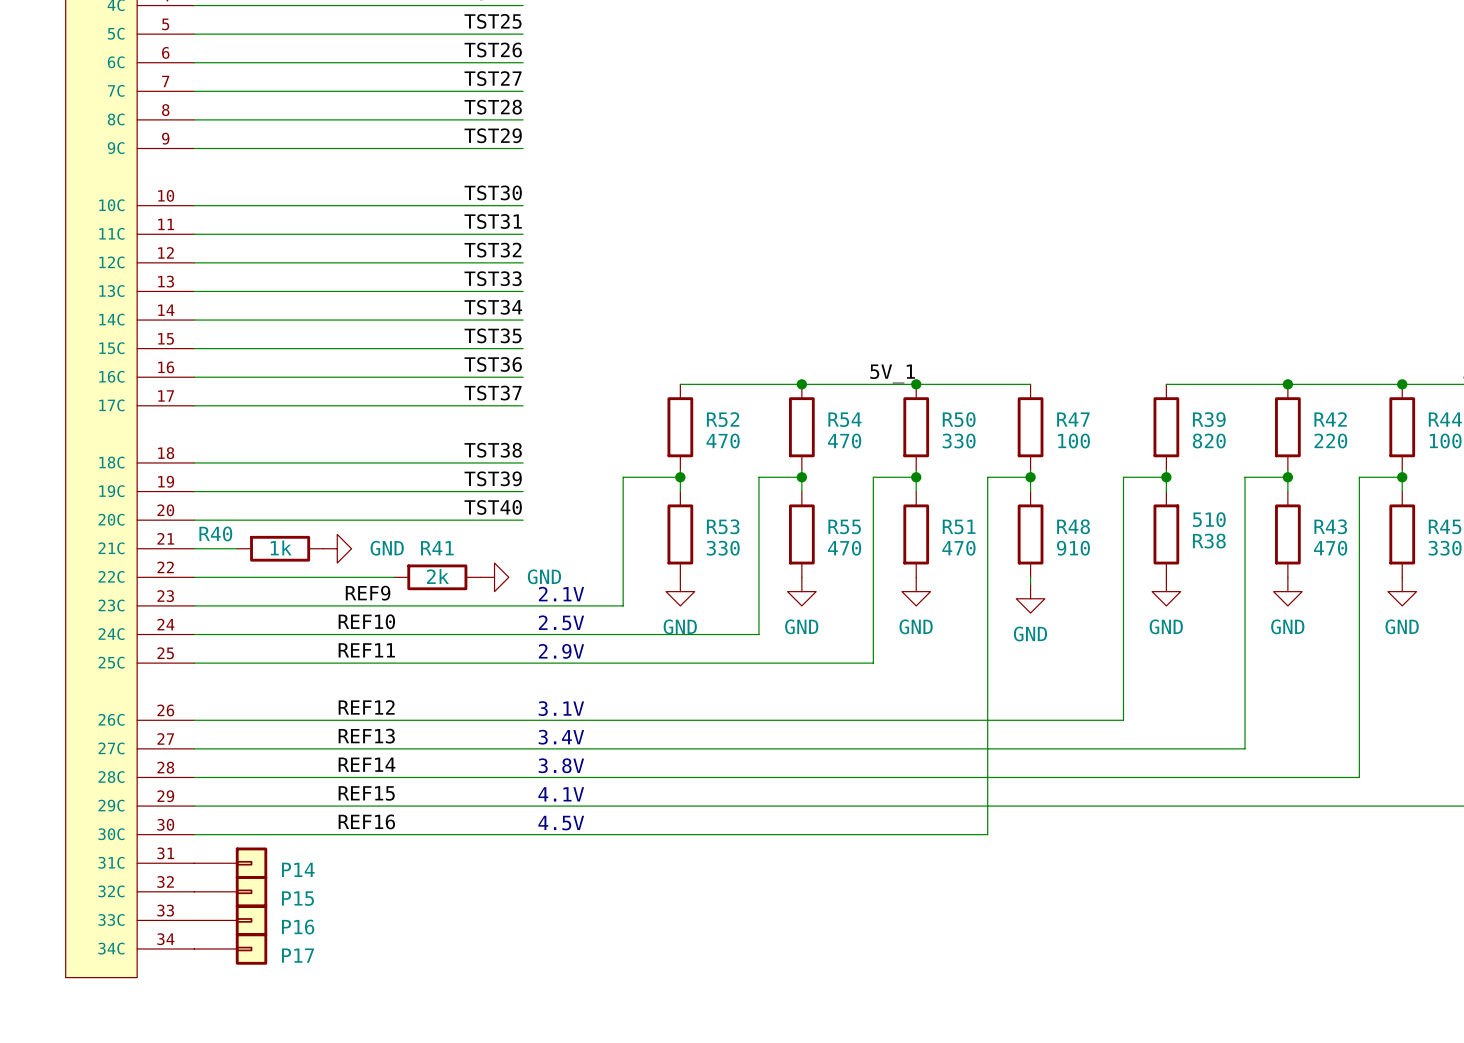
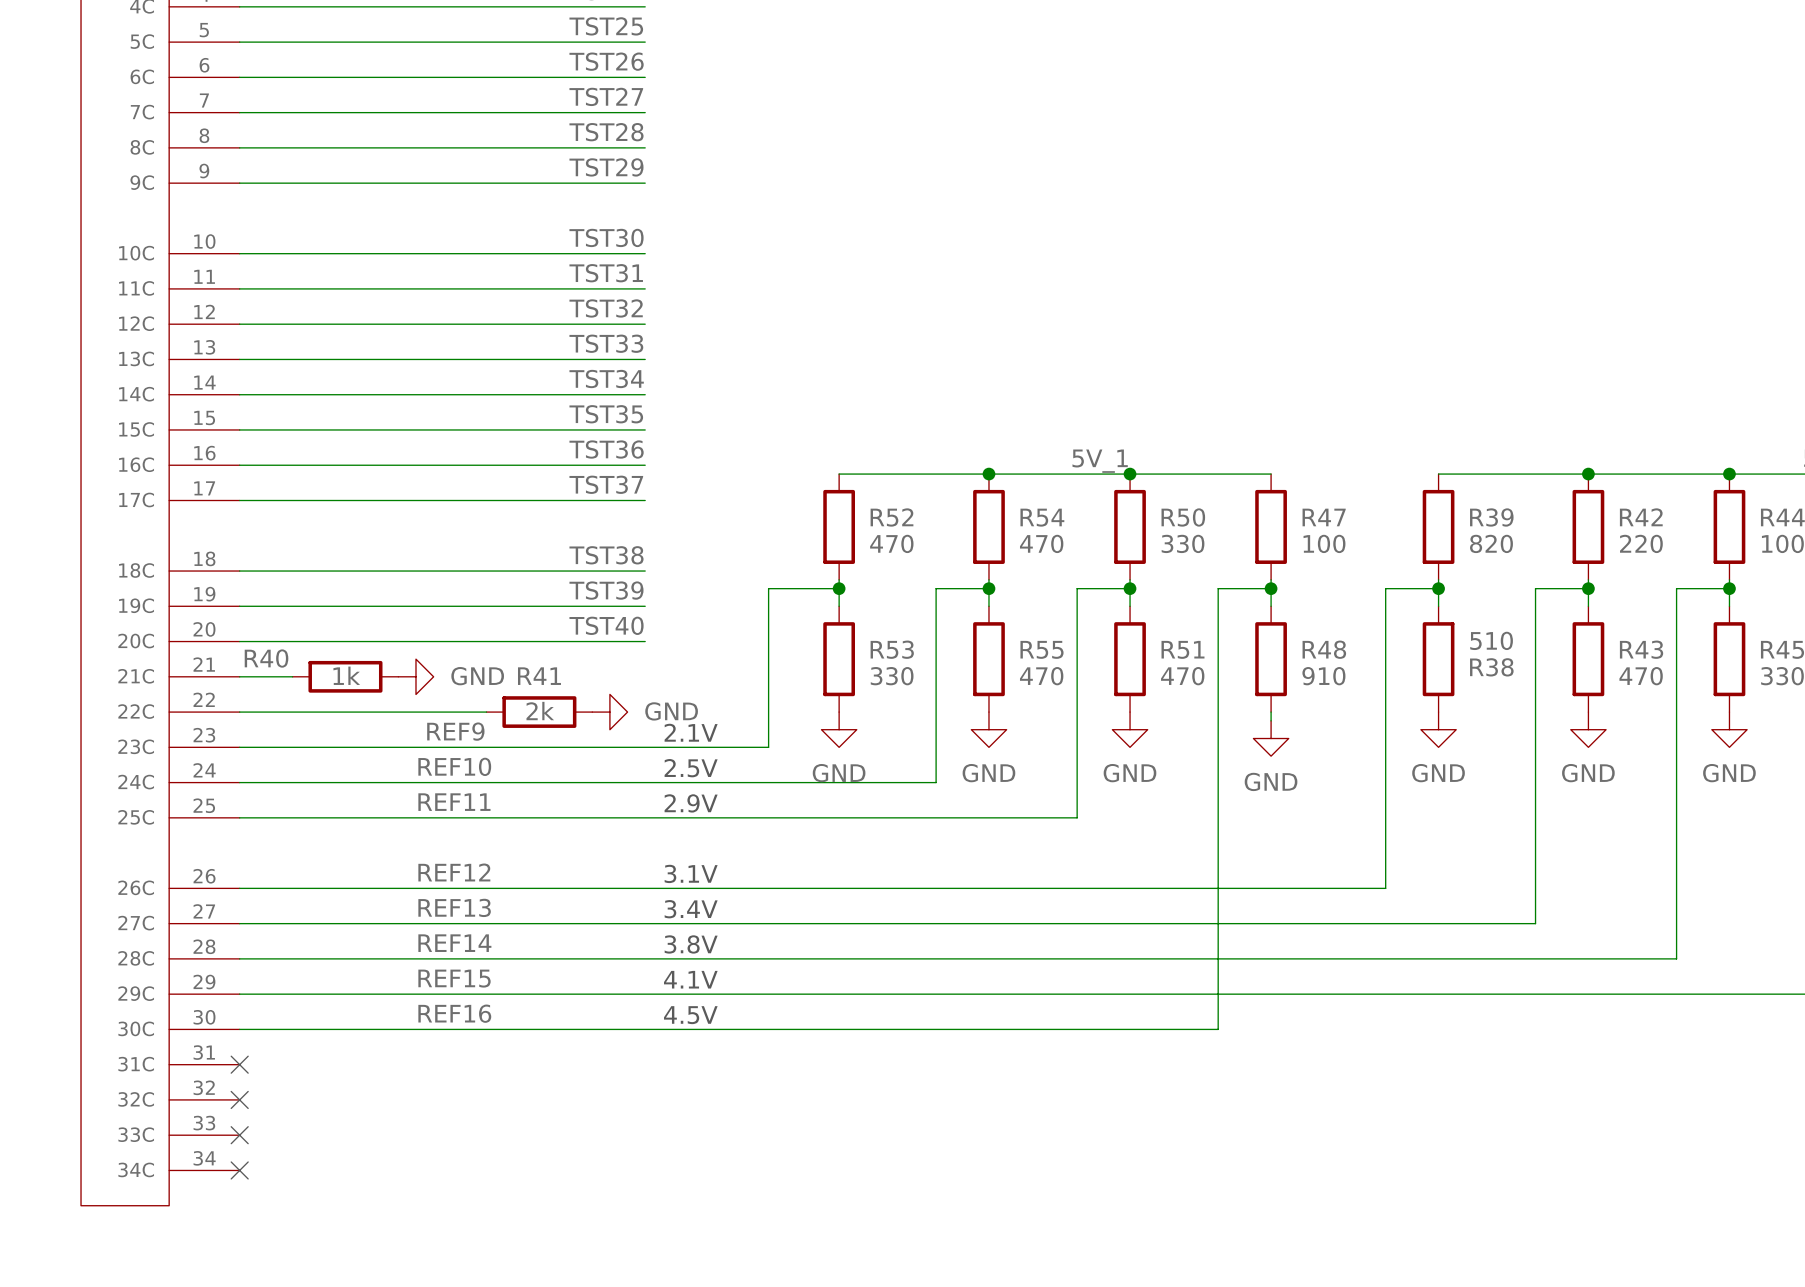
no-connect mark: none -> (239, 1064)
P14: (230, 863) -> none
no-connect mark: none -> (239, 1099)
P15: (230, 891) -> none
no-connect mark: none -> (239, 1135)
P16: (230, 920) -> none
no-connect mark: none -> (239, 1170)
P17: (230, 949) -> none

